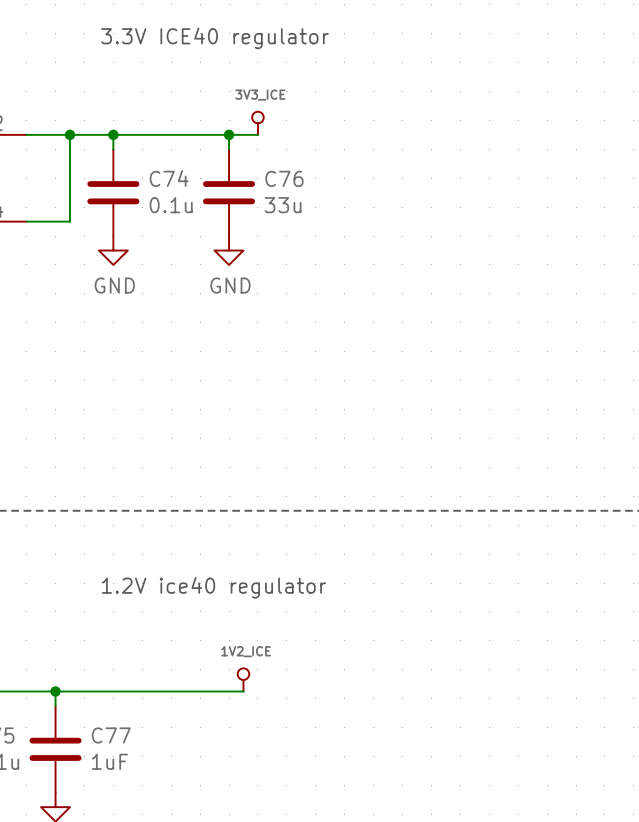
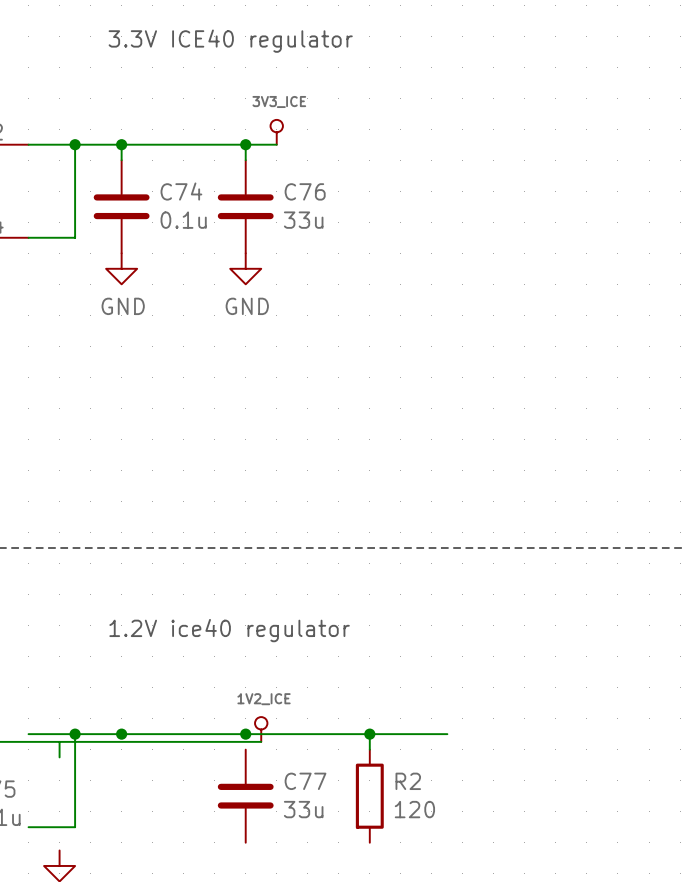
wire: none -> (28, 734) (447, 734)
wire: none -> (75, 734) (75, 827) (28, 827)
junction: none -> (121, 734)
junction: none -> (245, 734)
wire: none -> (369, 734) (369, 749)
junction: none -> (369, 734)
junction position: (55, 691) -> (75, 734)
R2: none -> 120 (369, 796)
C77 position: (55, 749) -> (245, 796)
C77 value: 1uF (109, 761) -> 33u (303, 809)

